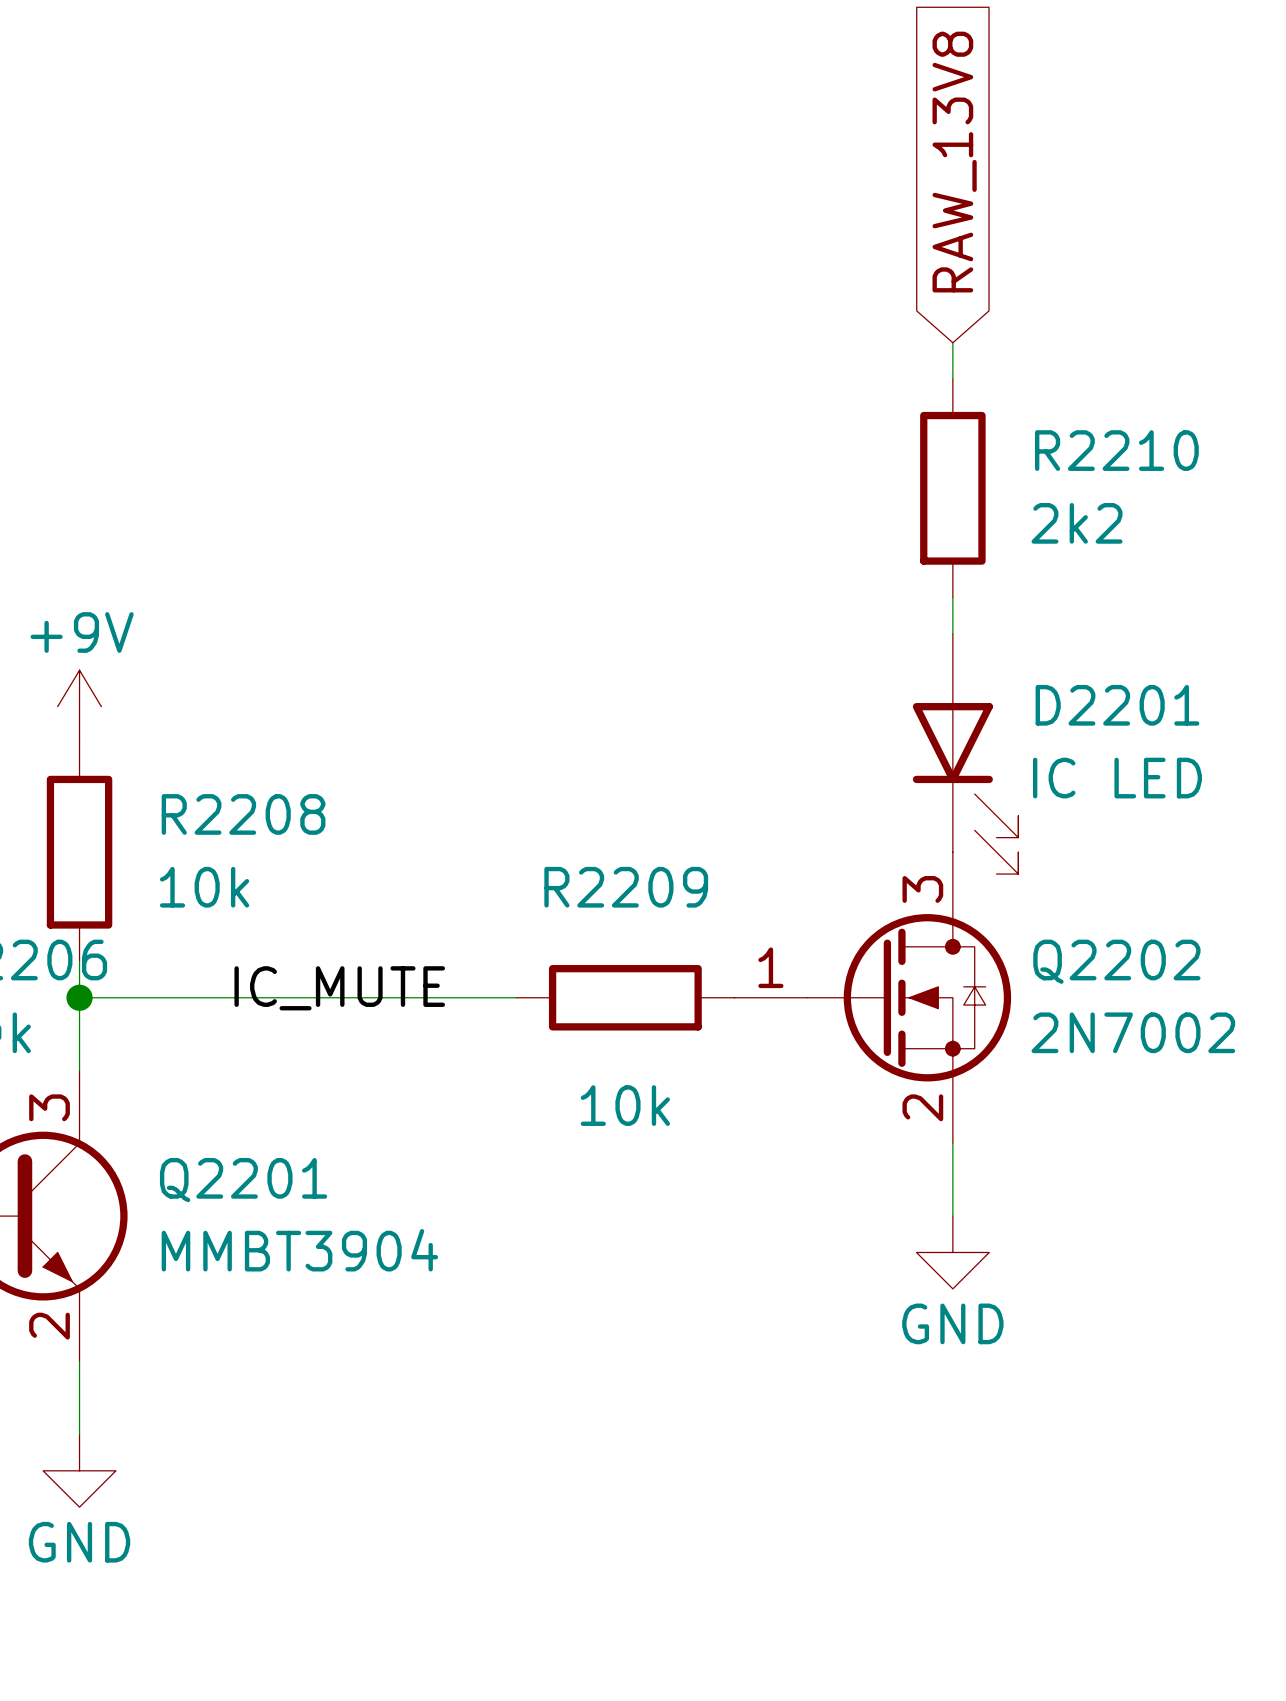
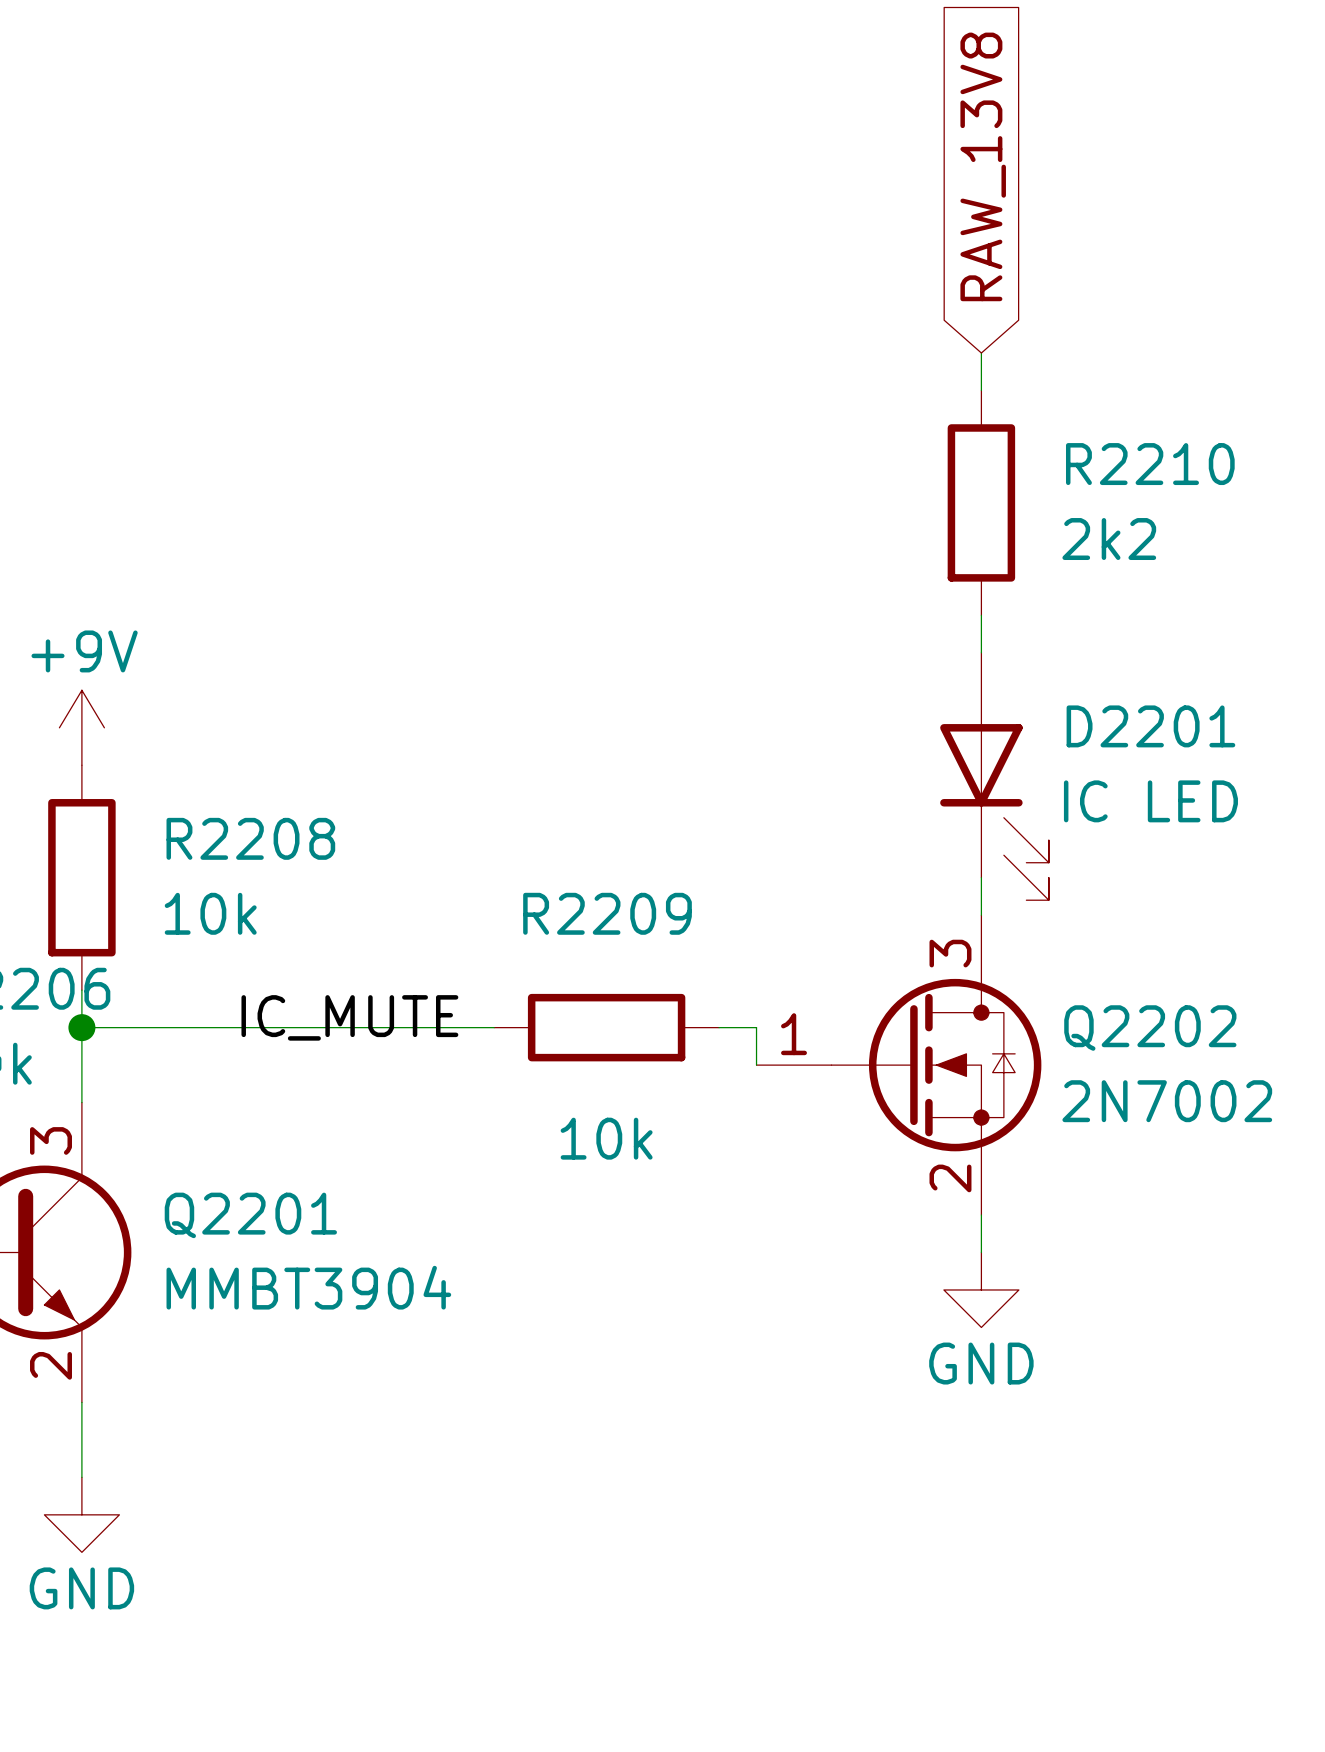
R2209 position: (625, 997) -> (606, 1027)
wire: none -> (719, 1027) (756, 1027) (756, 1065)
Q2202 position: (872, 997) -> (898, 1065)

